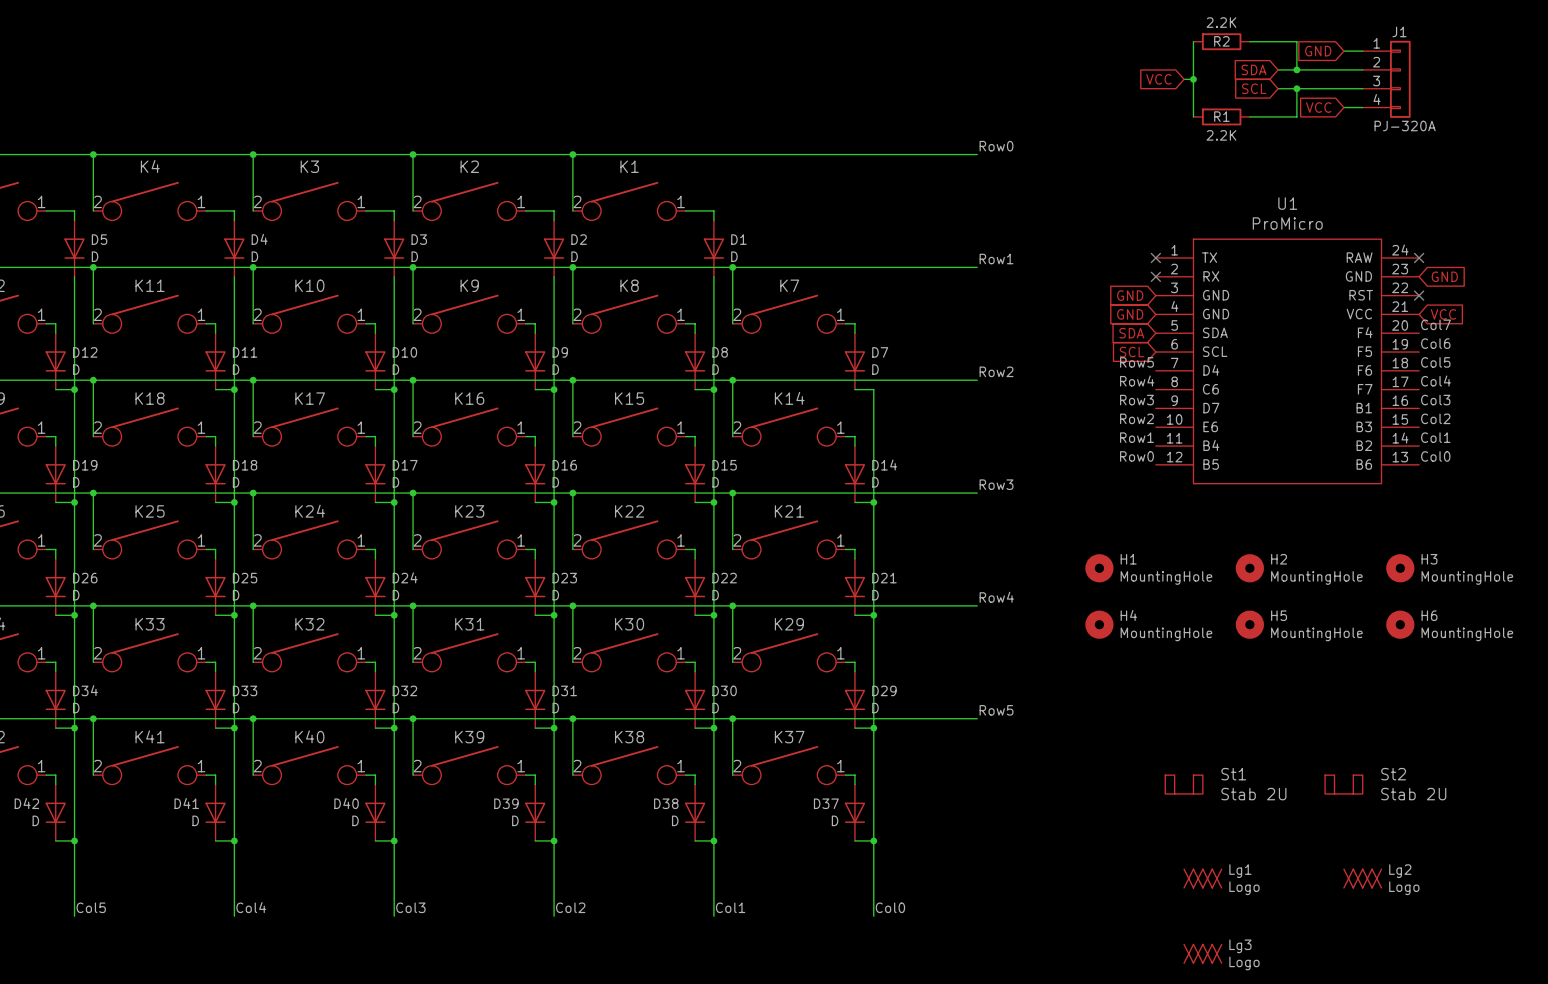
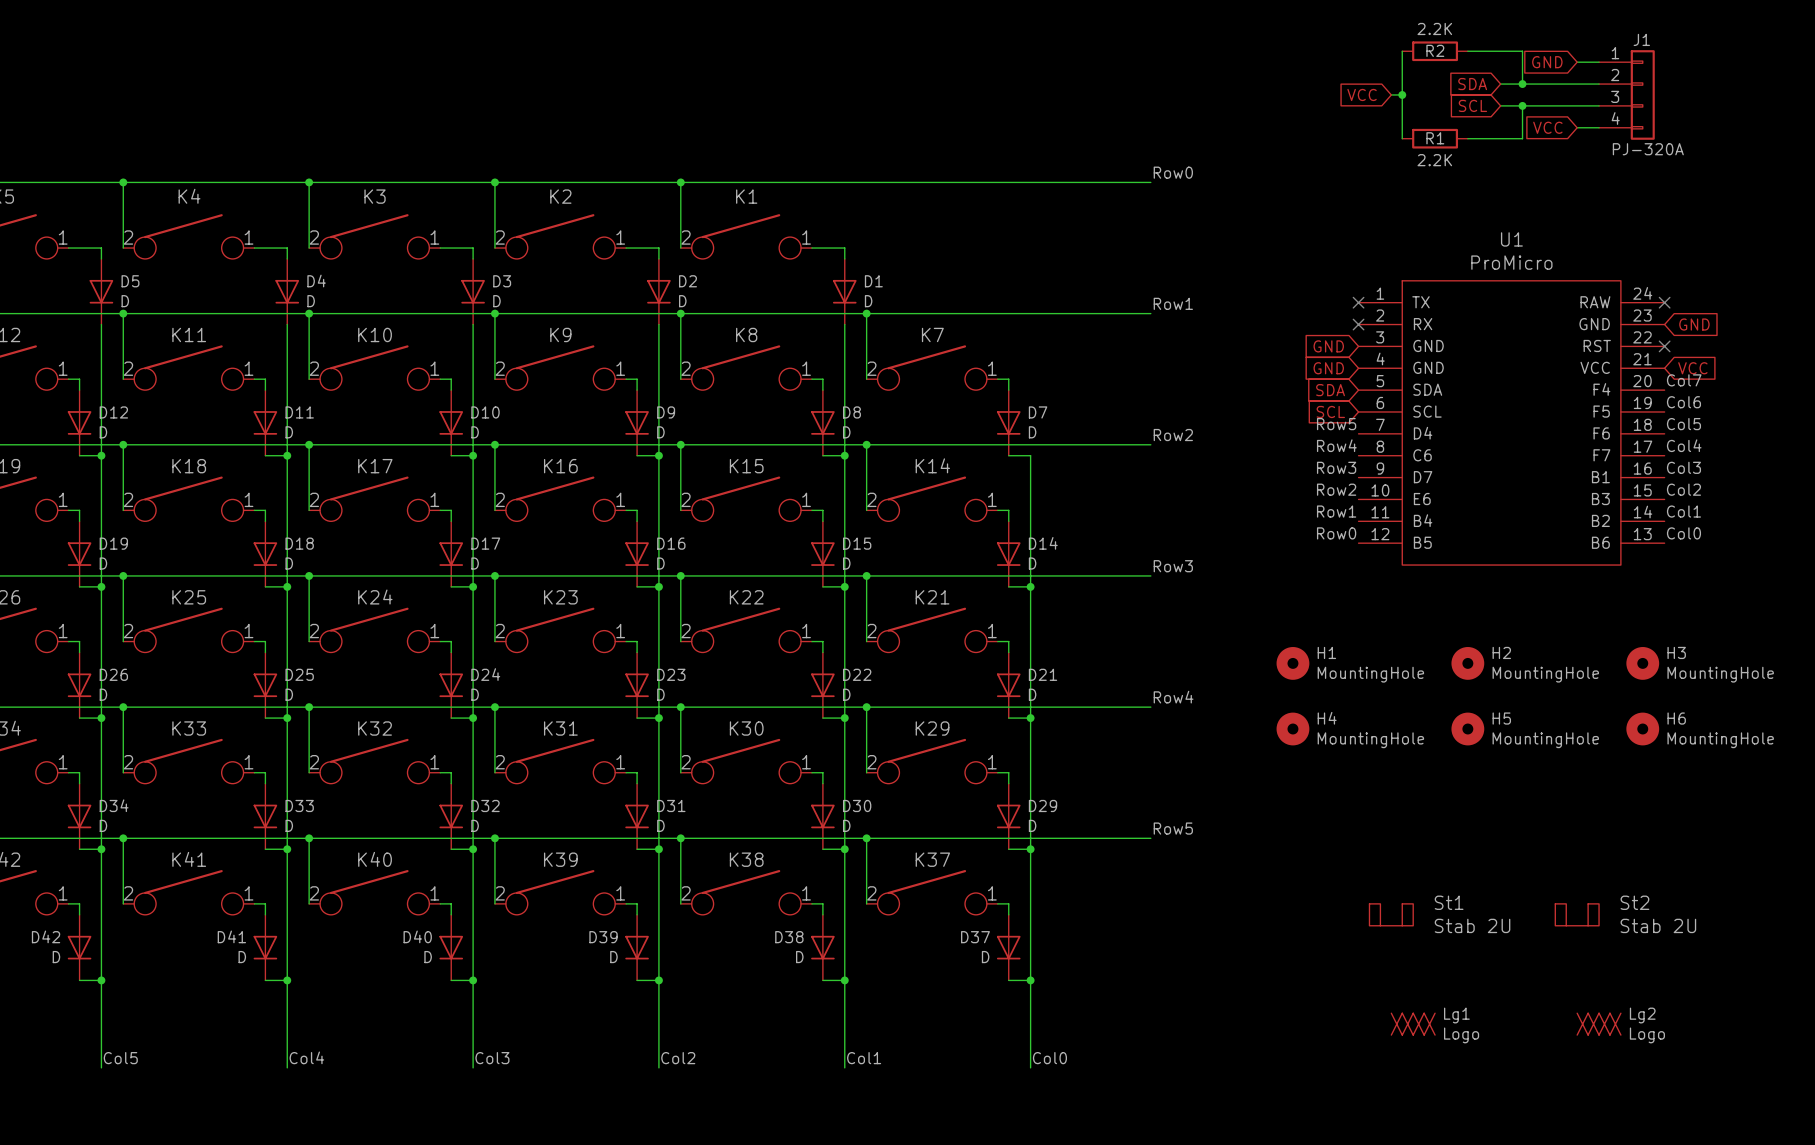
Lg3: Logo (1202, 953) -> none

